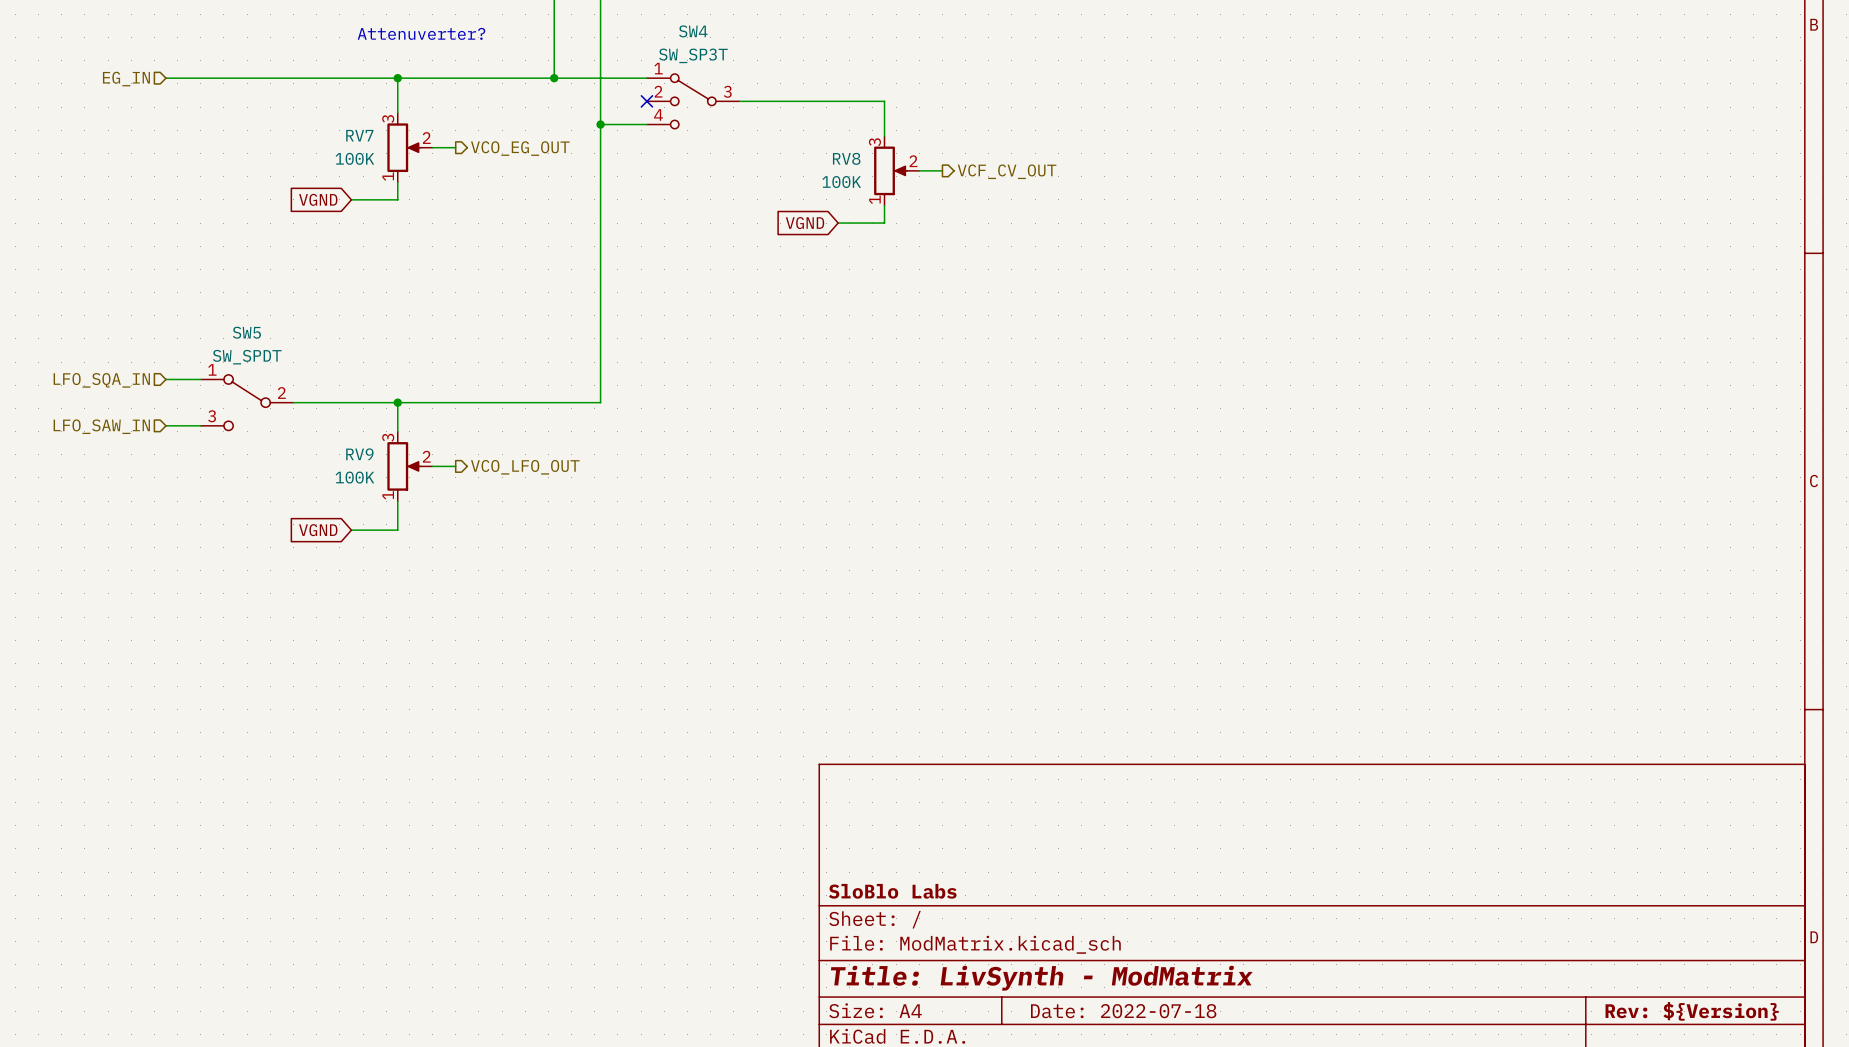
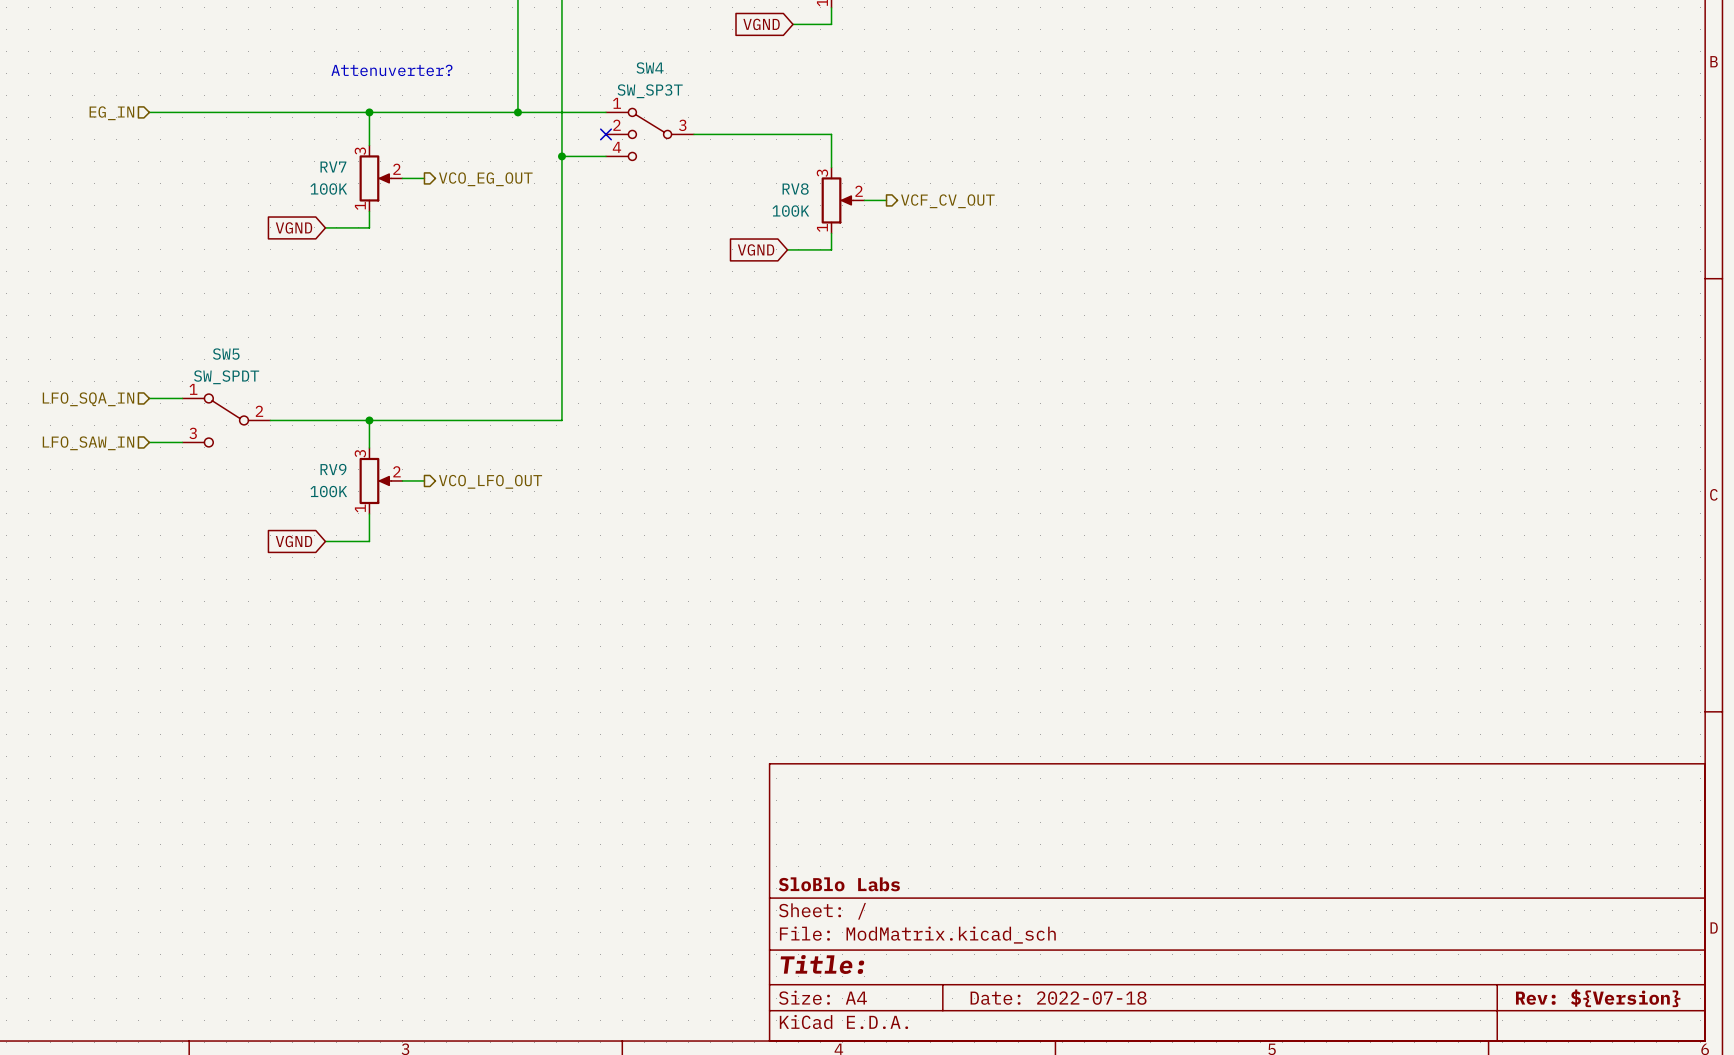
title block: Title: LivSynth - ModMatrix (1041, 978) -> Title: (822, 964)

